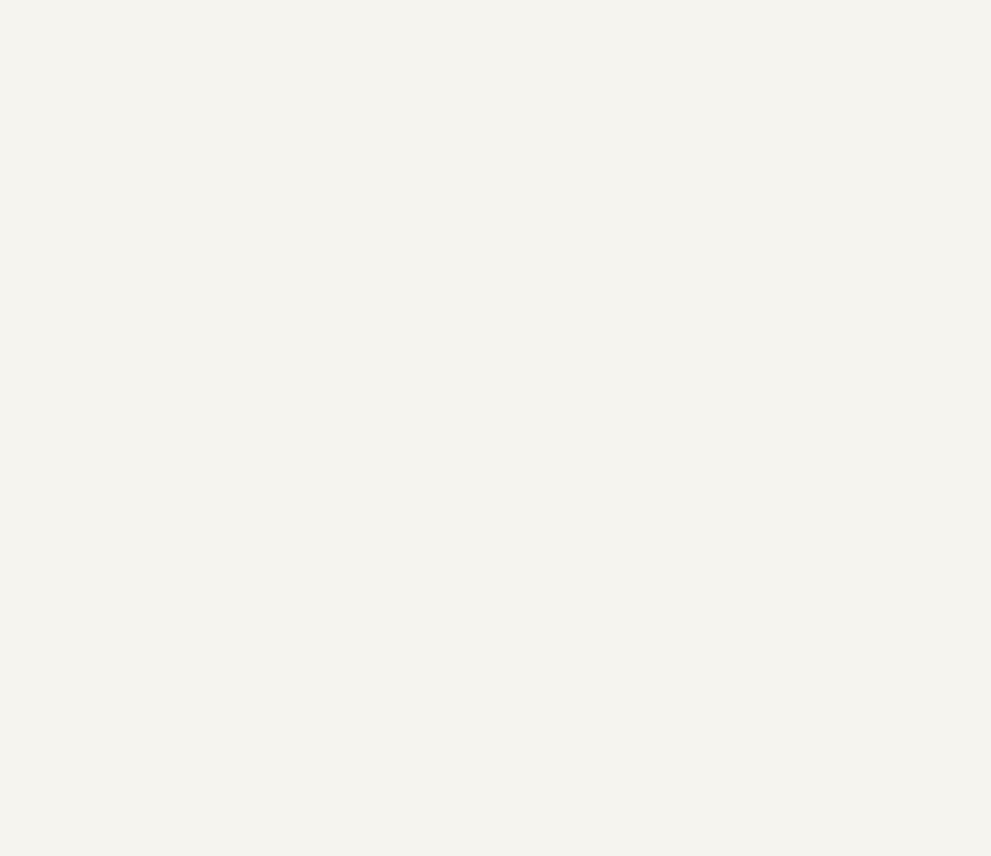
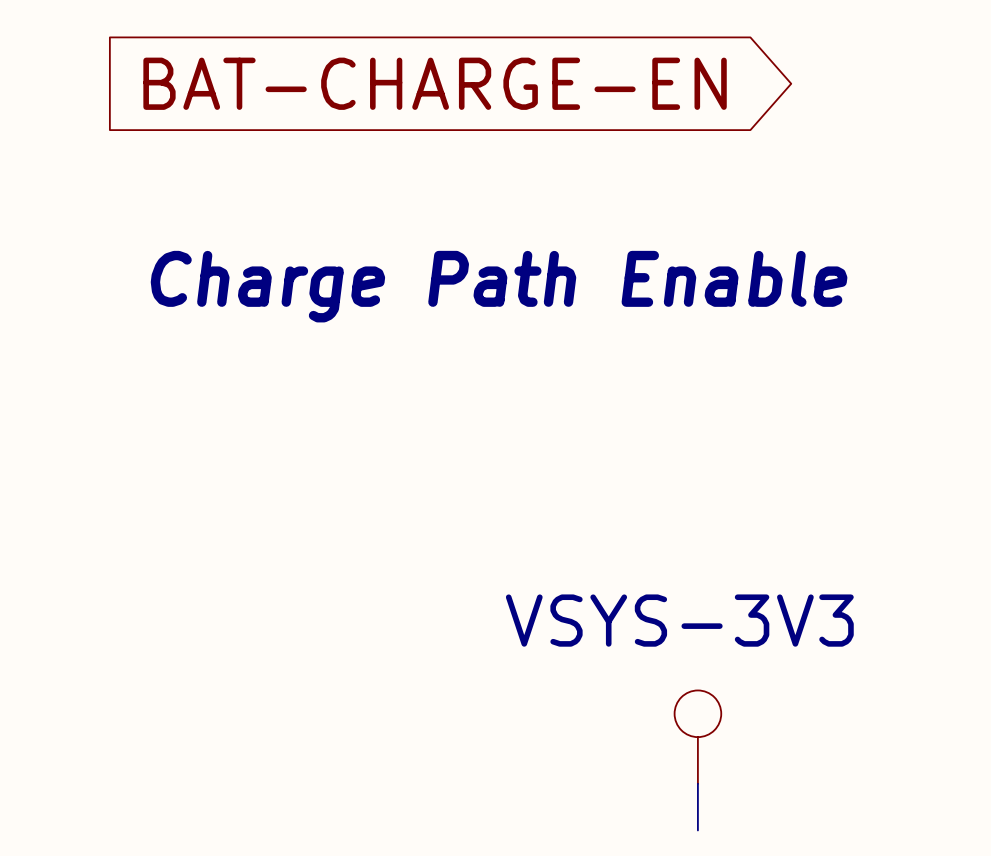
global label: none -> BAT-CHARGE-EN (435, 83)
text: none -> Charge Path Enable (499, 286)
power symbol: none -> VSYS-3V3 (697, 737)
wire: none -> (697, 783) (697, 830)

